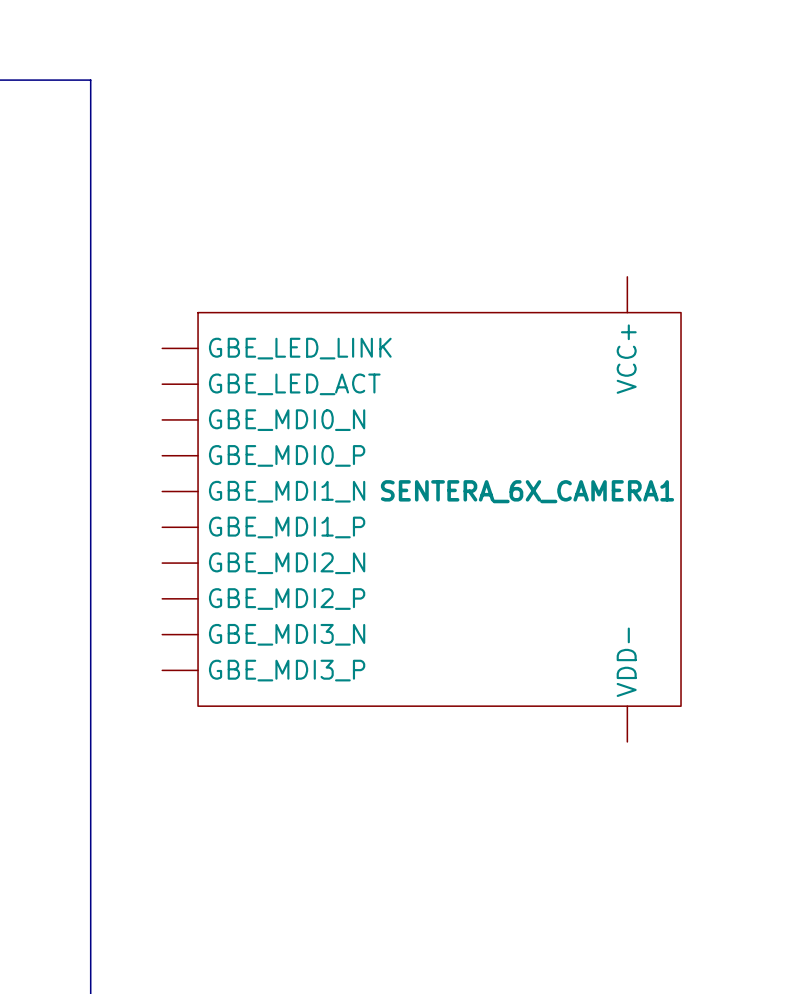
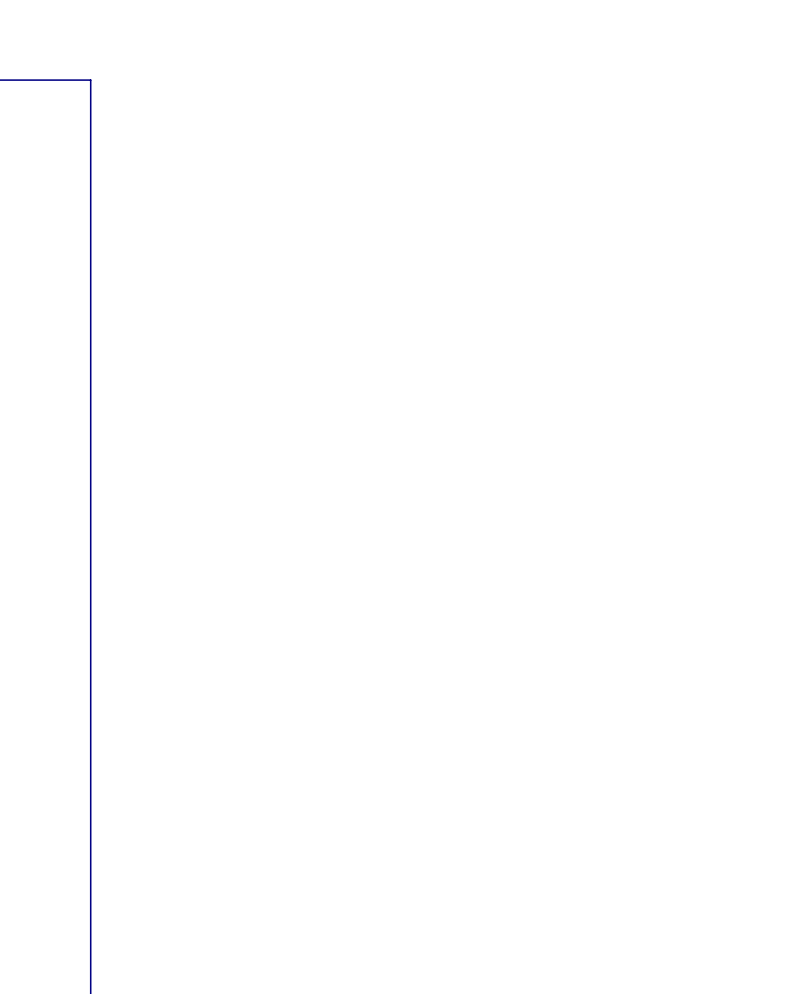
SENTERA_6X_CAMERA1: (421, 509) -> none

